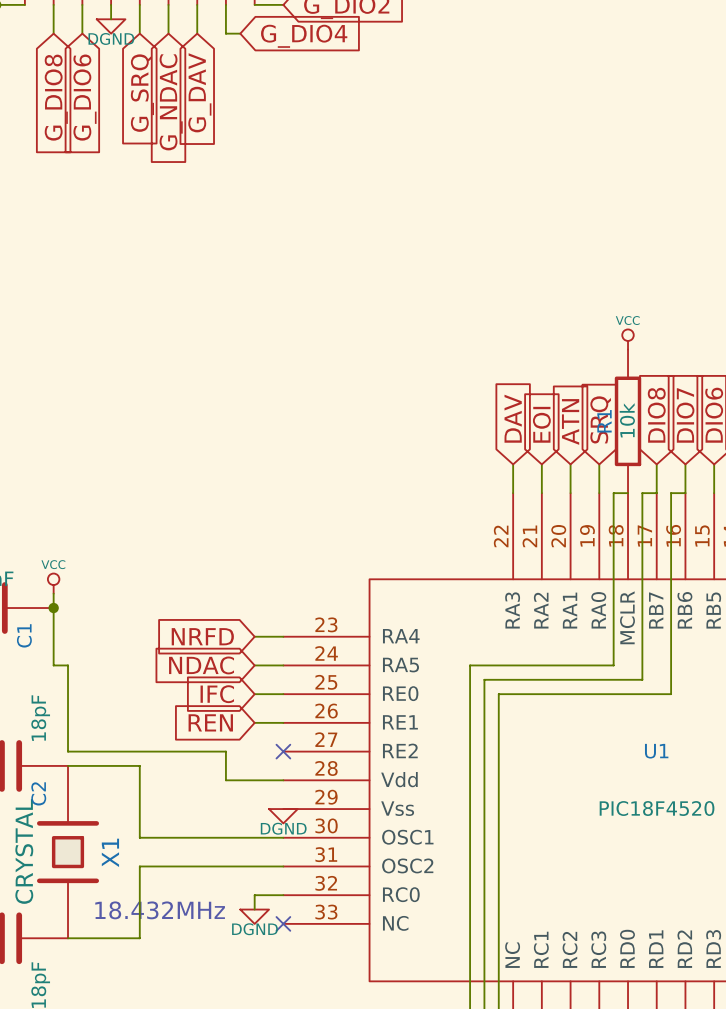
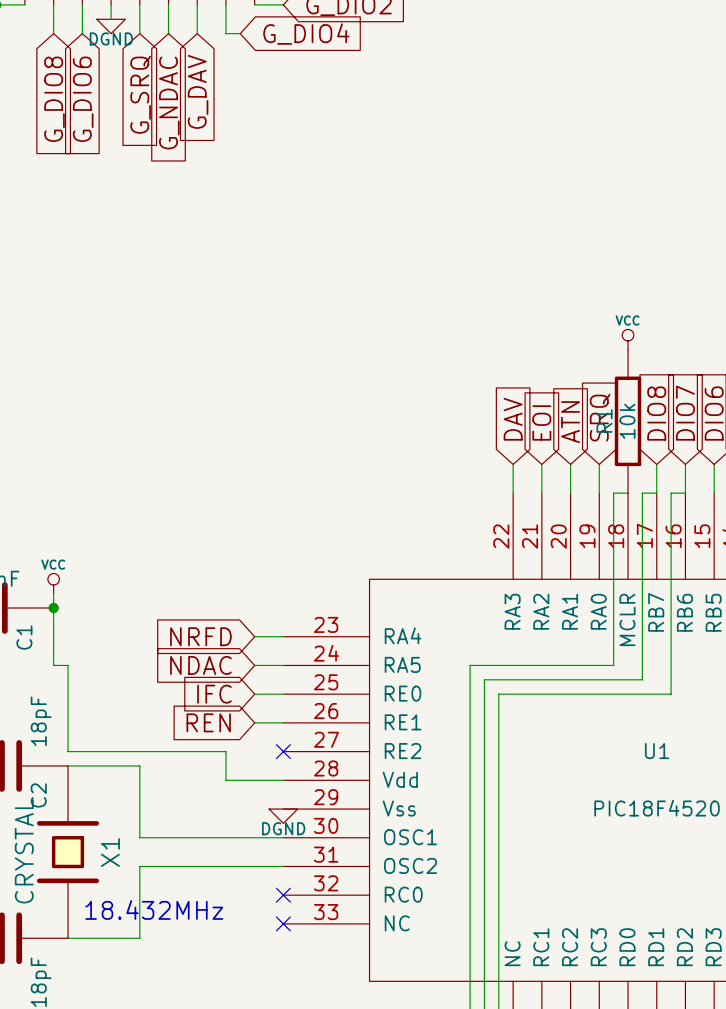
wire: (283, 895) (254, 895) (254, 909) -> none
no-connect mark: none -> (283, 895)
power symbol: DGND (254, 916) -> none

